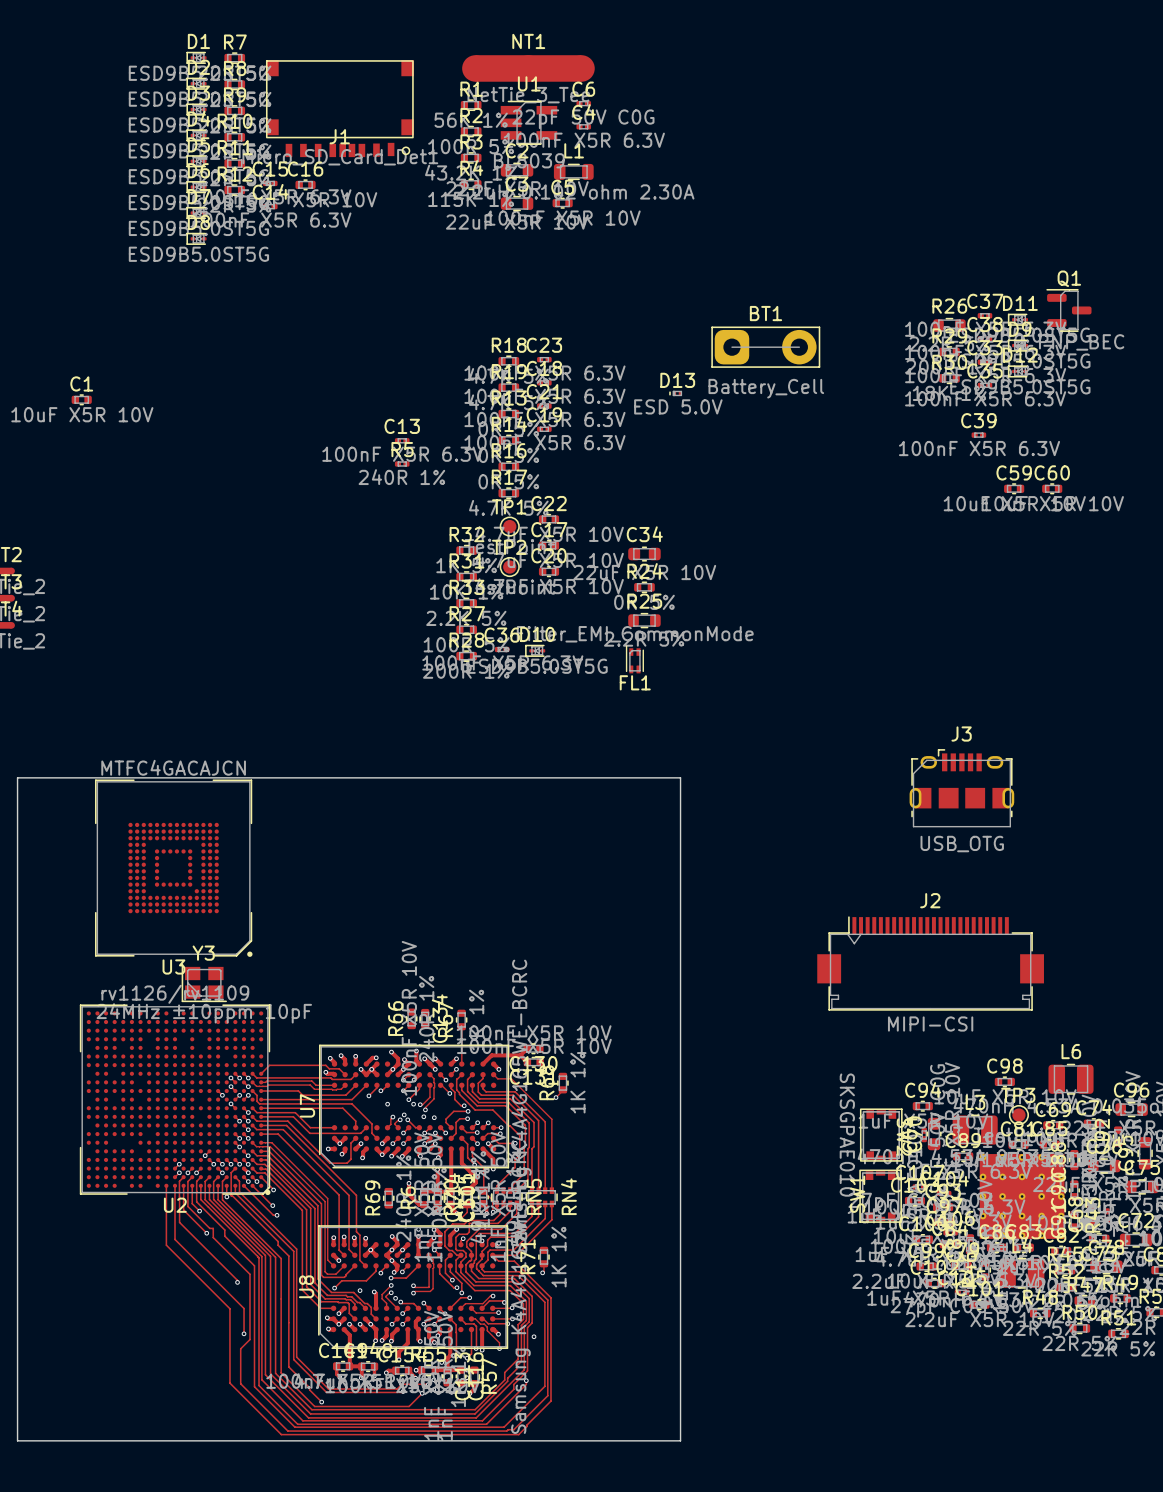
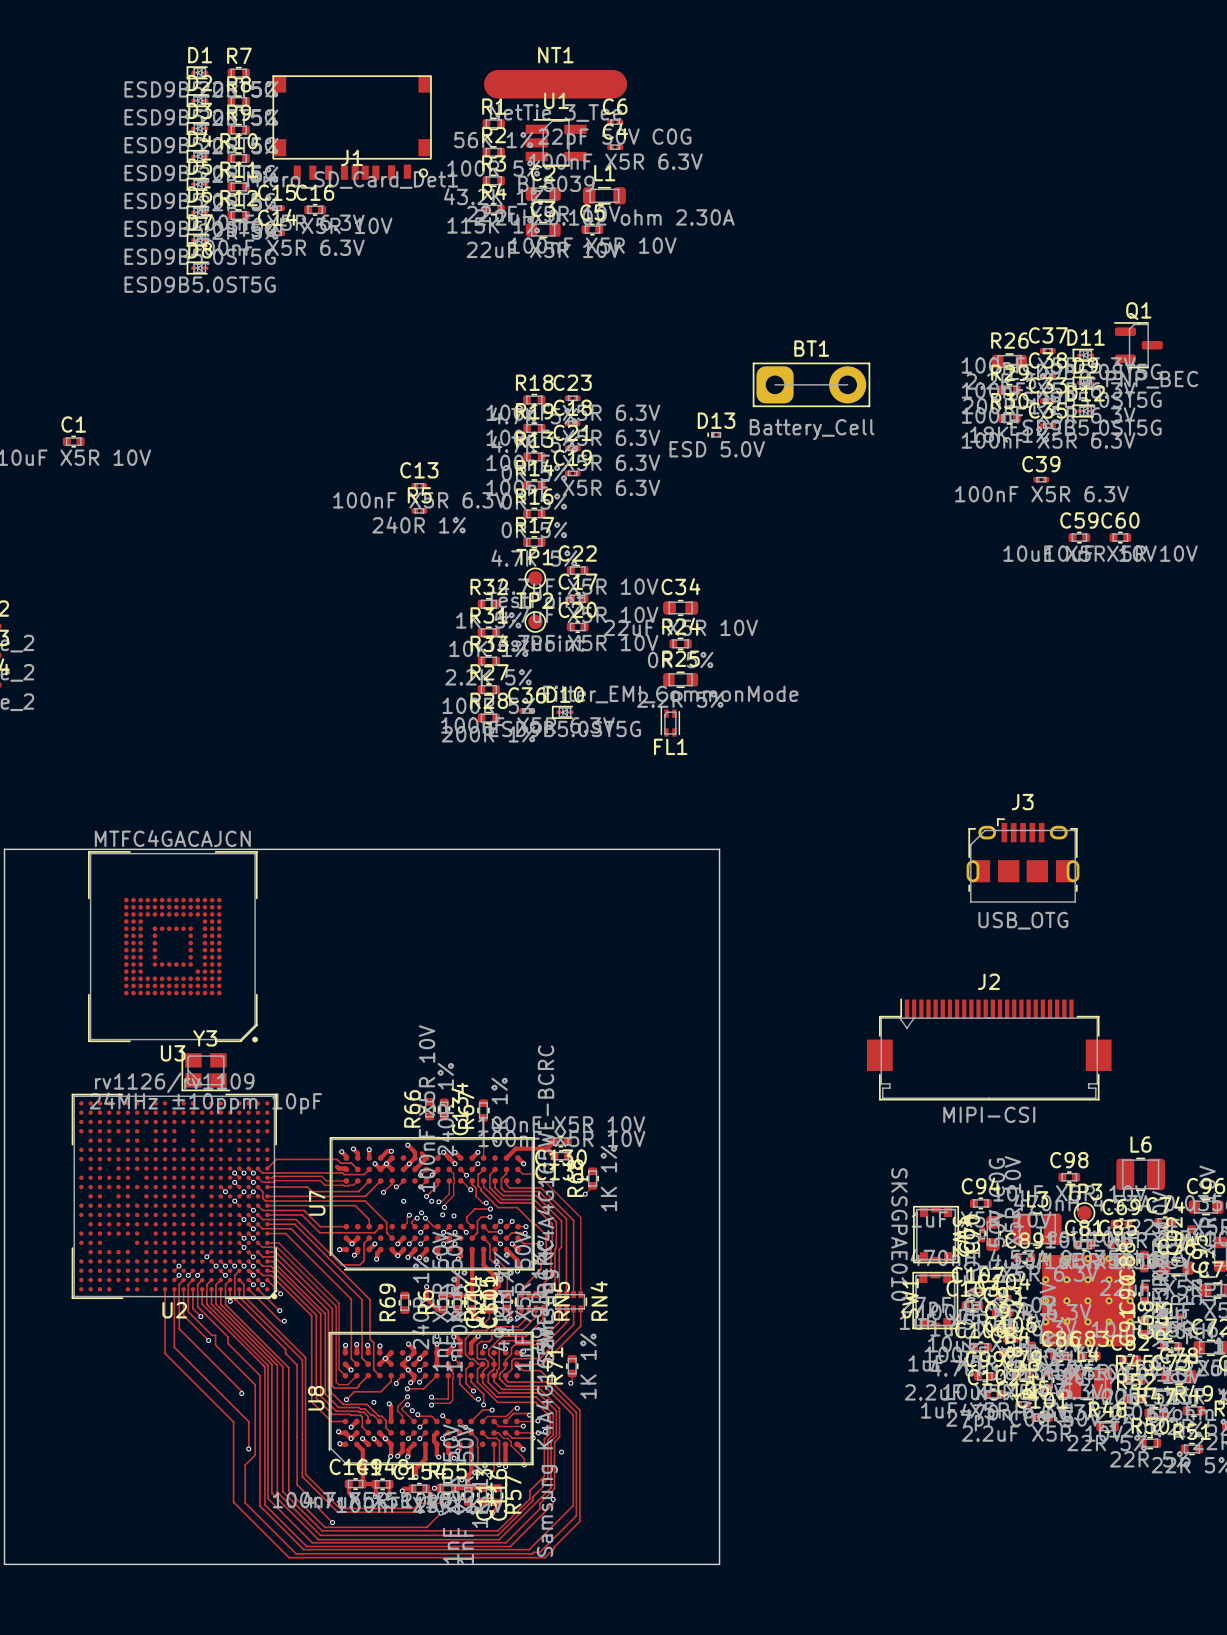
track: (416, 1051) (416, 1061) (419, 1064) -> none
via: (416, 1051) -> none
via: (404, 1059) -> none
via: (403, 1069) -> none
via: (325, 1072) -> none

